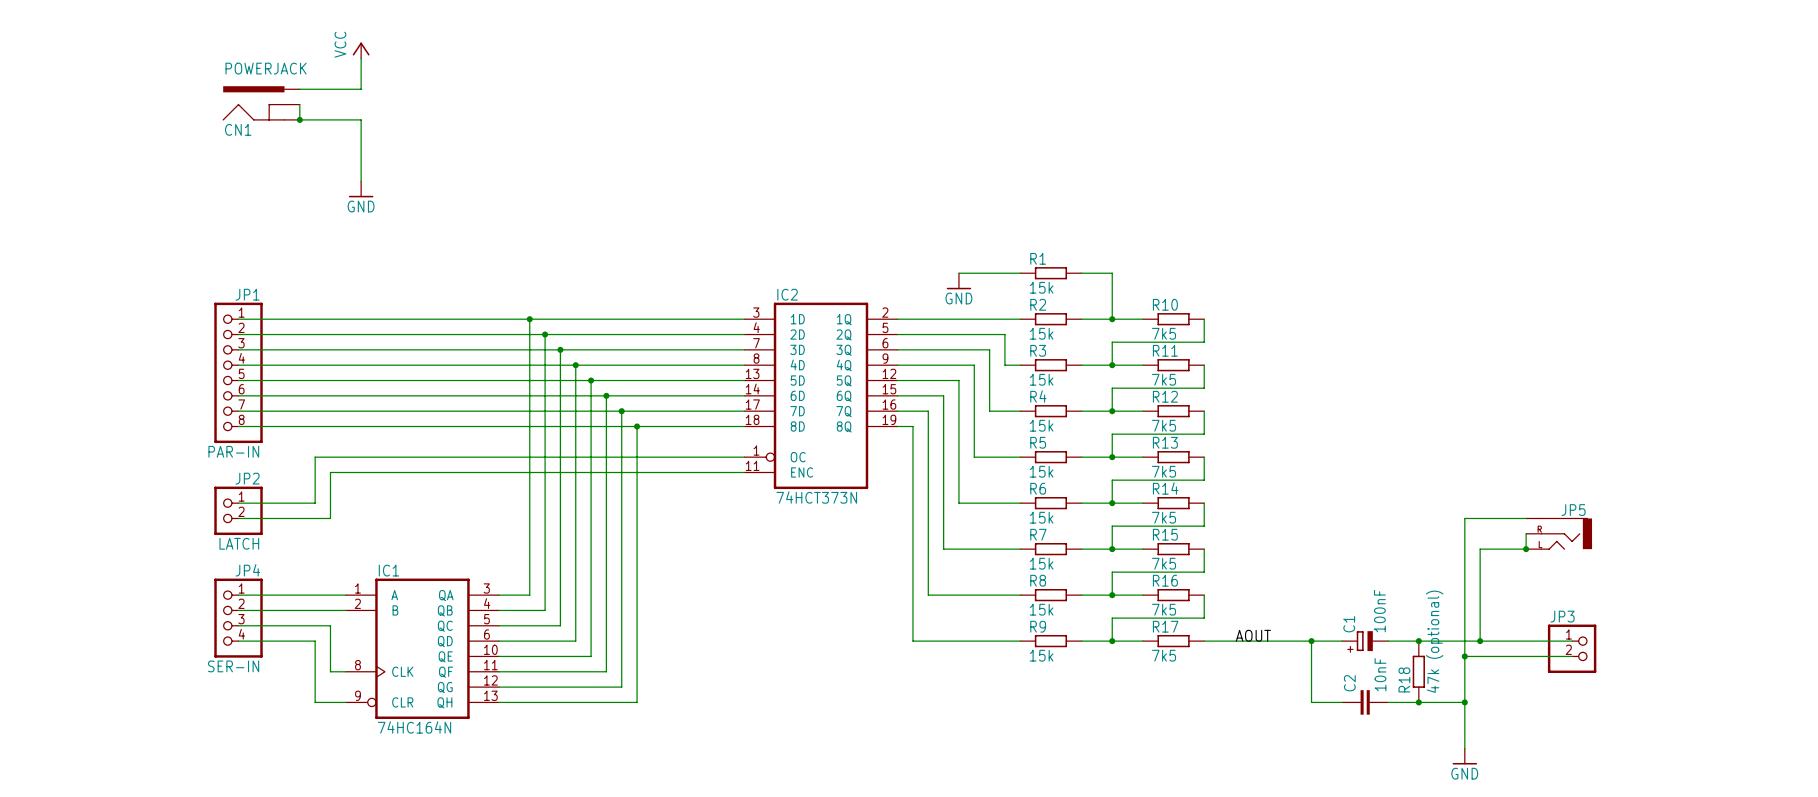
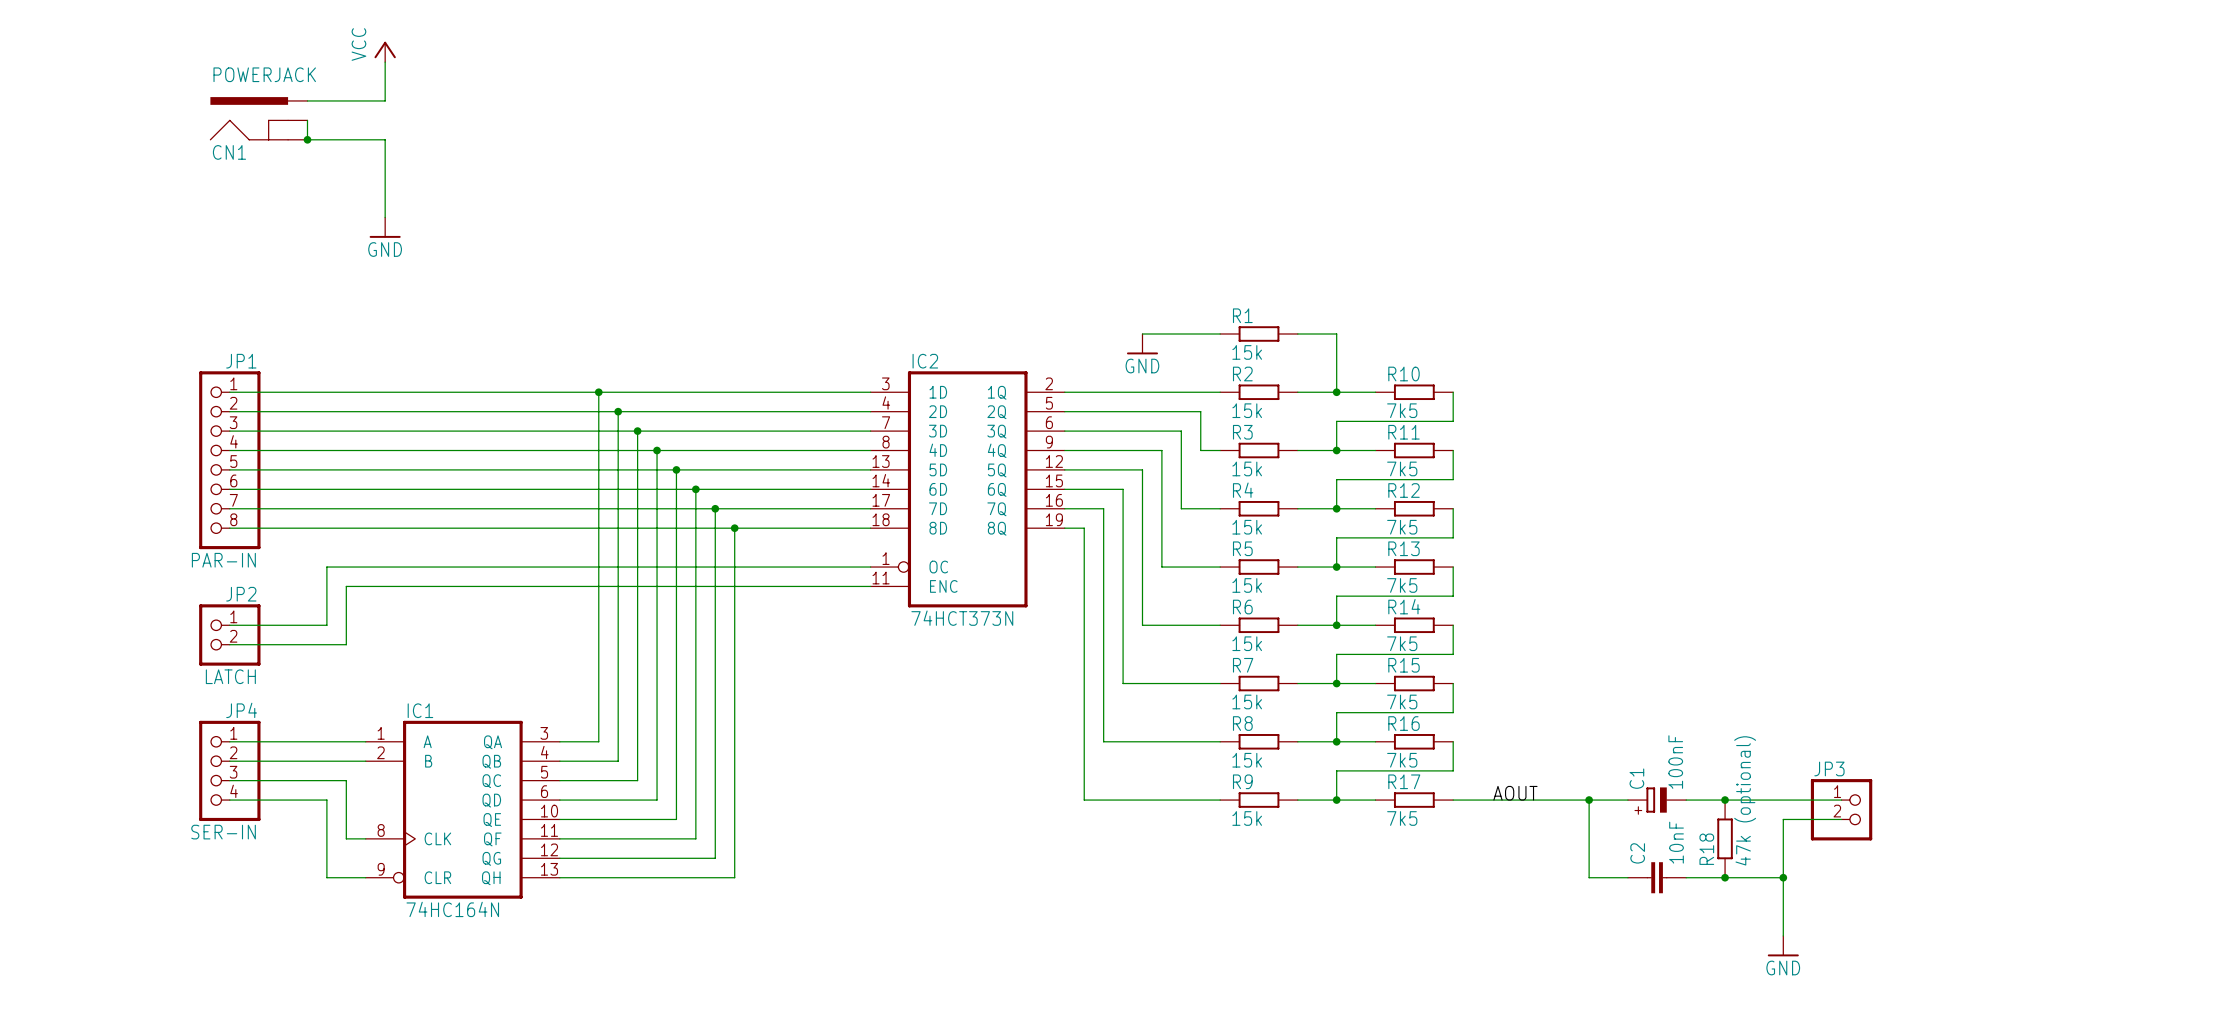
wire: (1526, 518) (1464, 518) (1464, 656) -> none
wire: (1526, 533) (1526, 549) (1480, 549) (1480, 641) -> none
JP5: (1559, 533) -> none
junction: (1526, 549) -> none
junction: (1480, 641) -> none
wire: (1510, 641) (1572, 641) -> none
JP3 position: (1572, 648) -> (1841, 809)
junction: (1464, 656) -> none
wire: (1510, 656) (1572, 656) -> none

